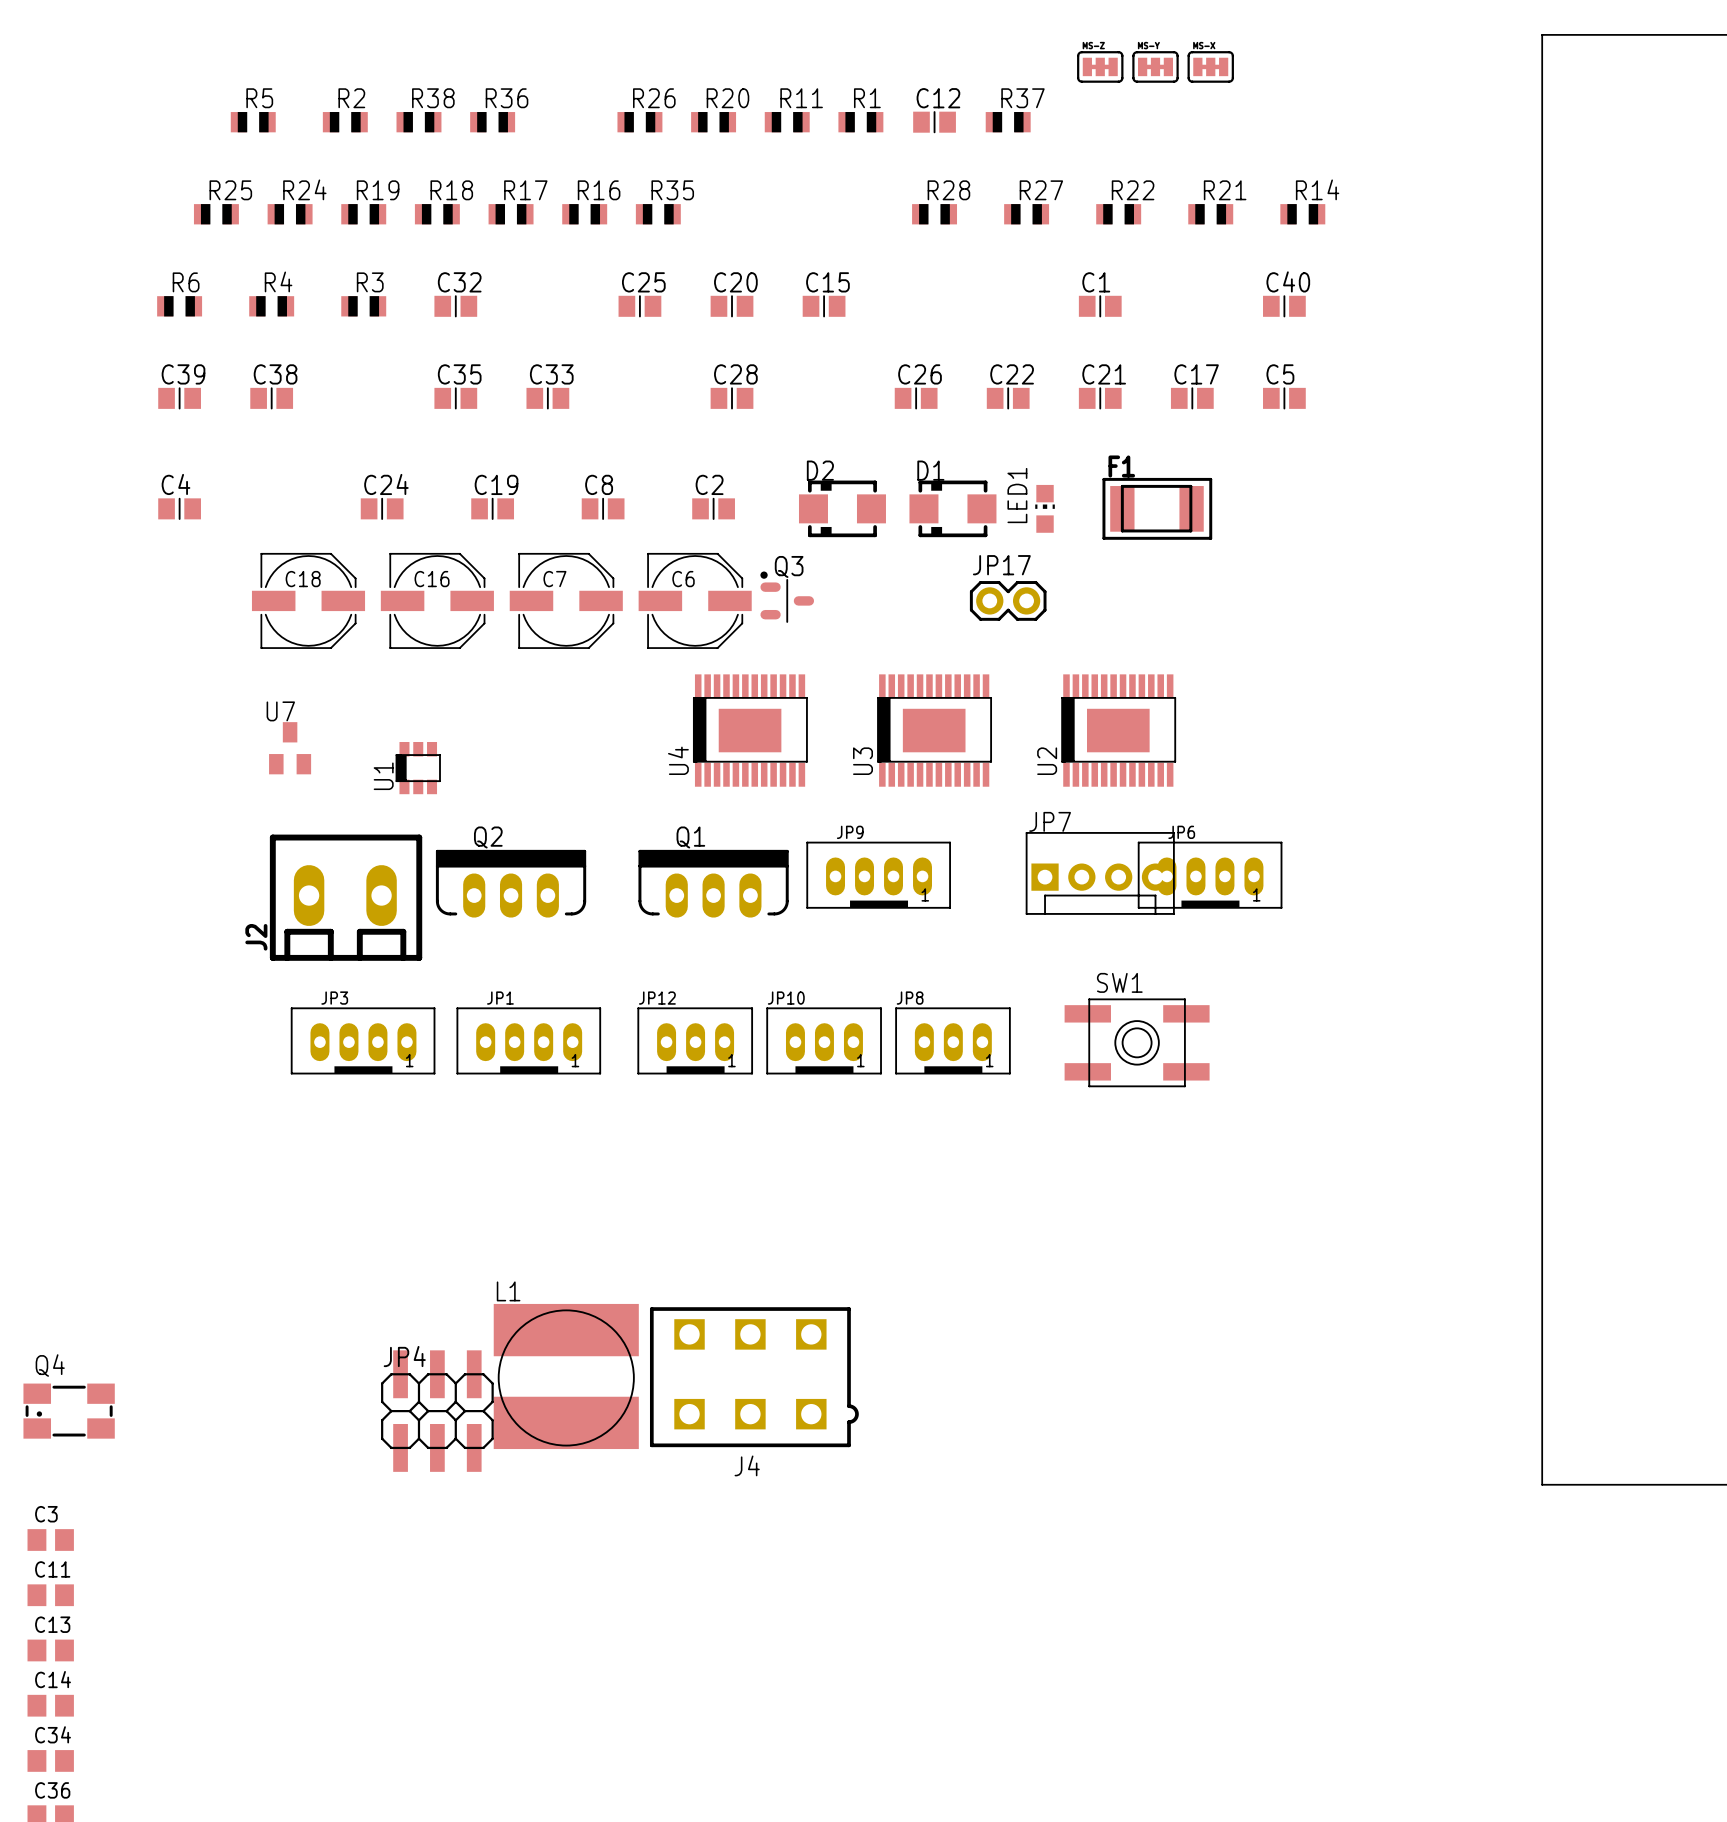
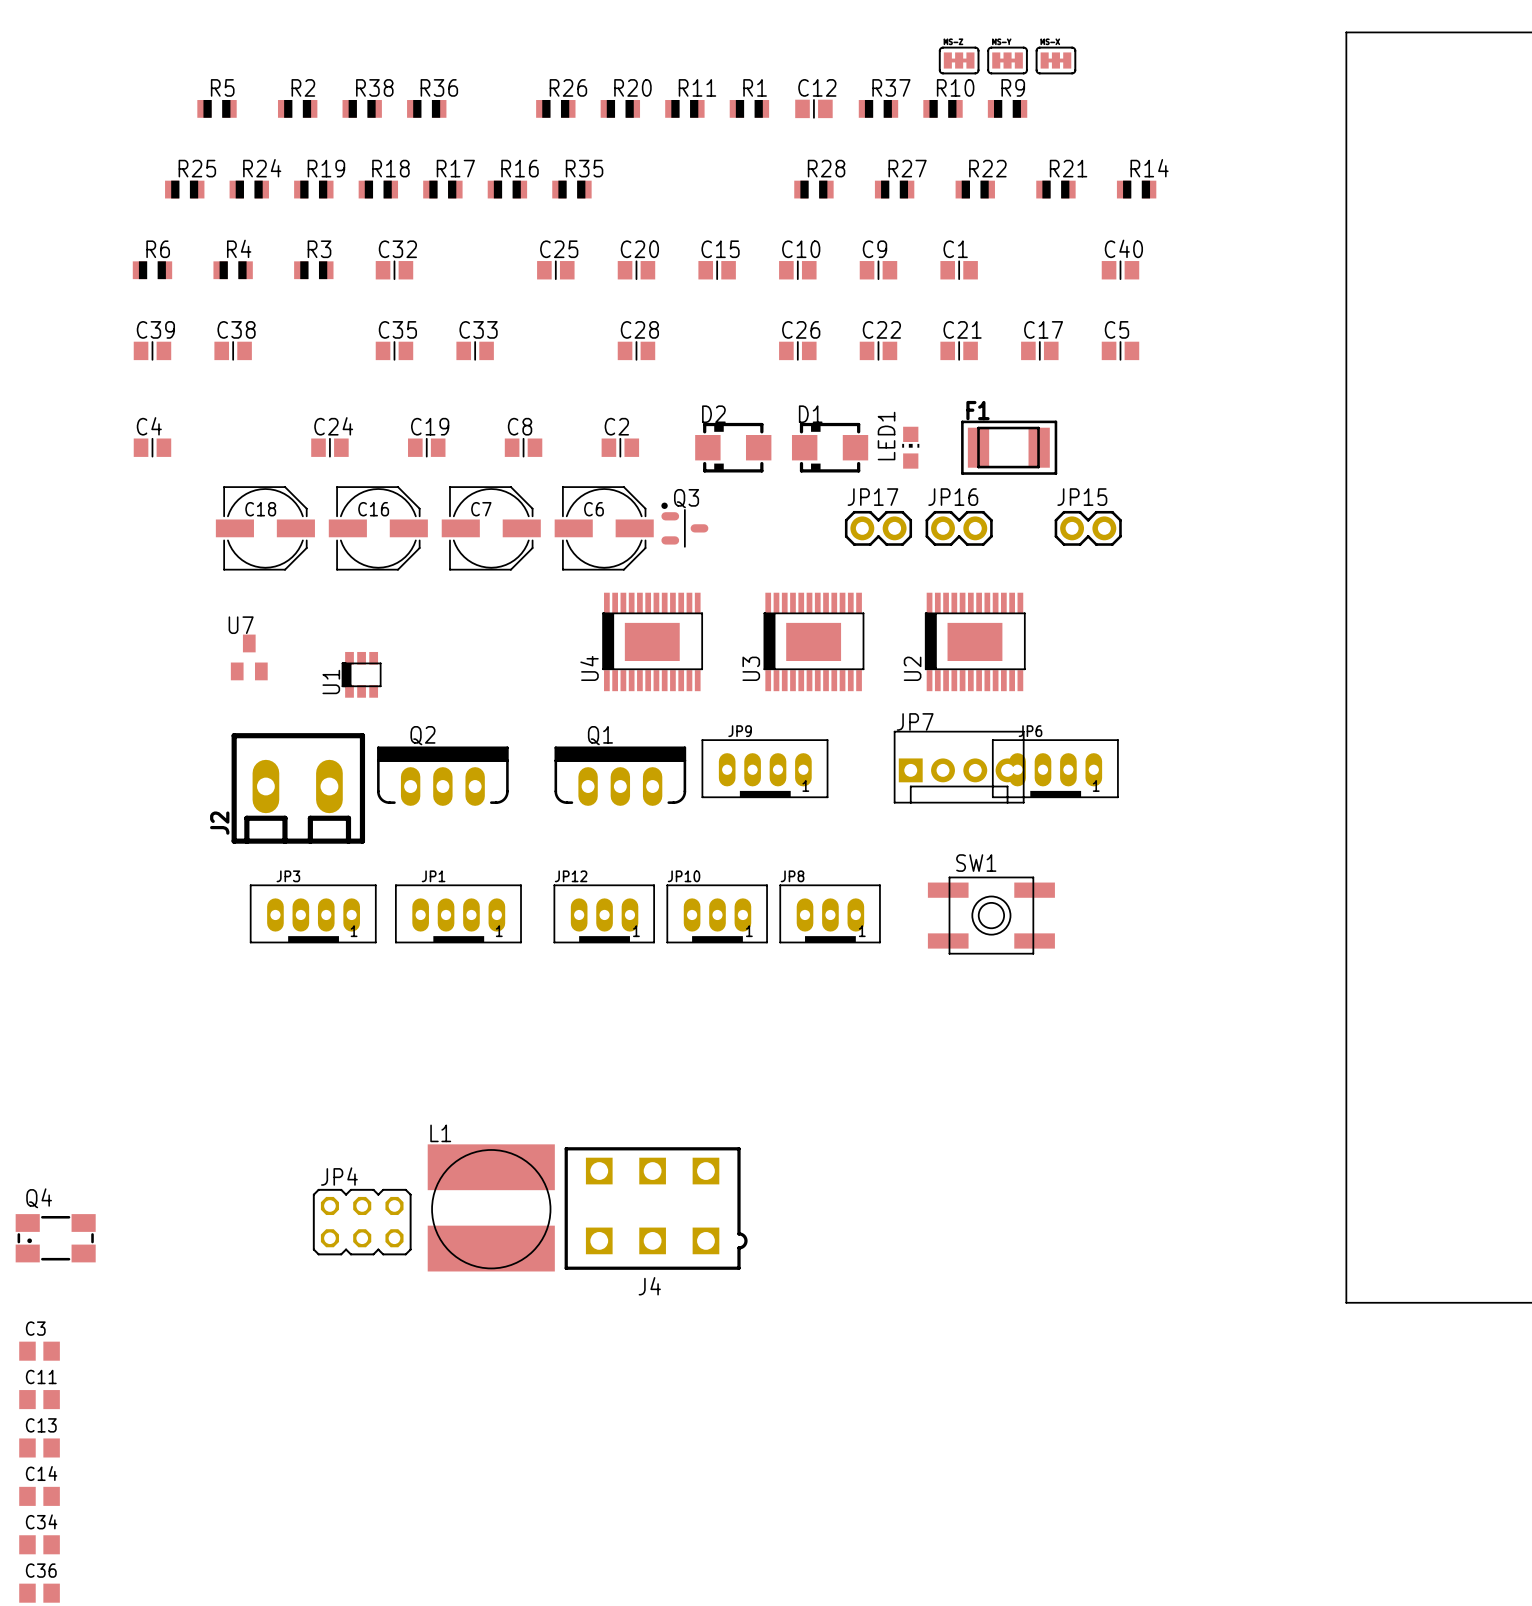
R10: none -> (943, 108)
R9: none -> (1007, 108)
C10: none -> (797, 270)
C9: none -> (878, 270)
JP16: none -> (959, 528)
JP15: none -> (1088, 528)
JP4 footprint: [381, 1350, 494, 1472] -> [312, 1188, 412, 1256]

